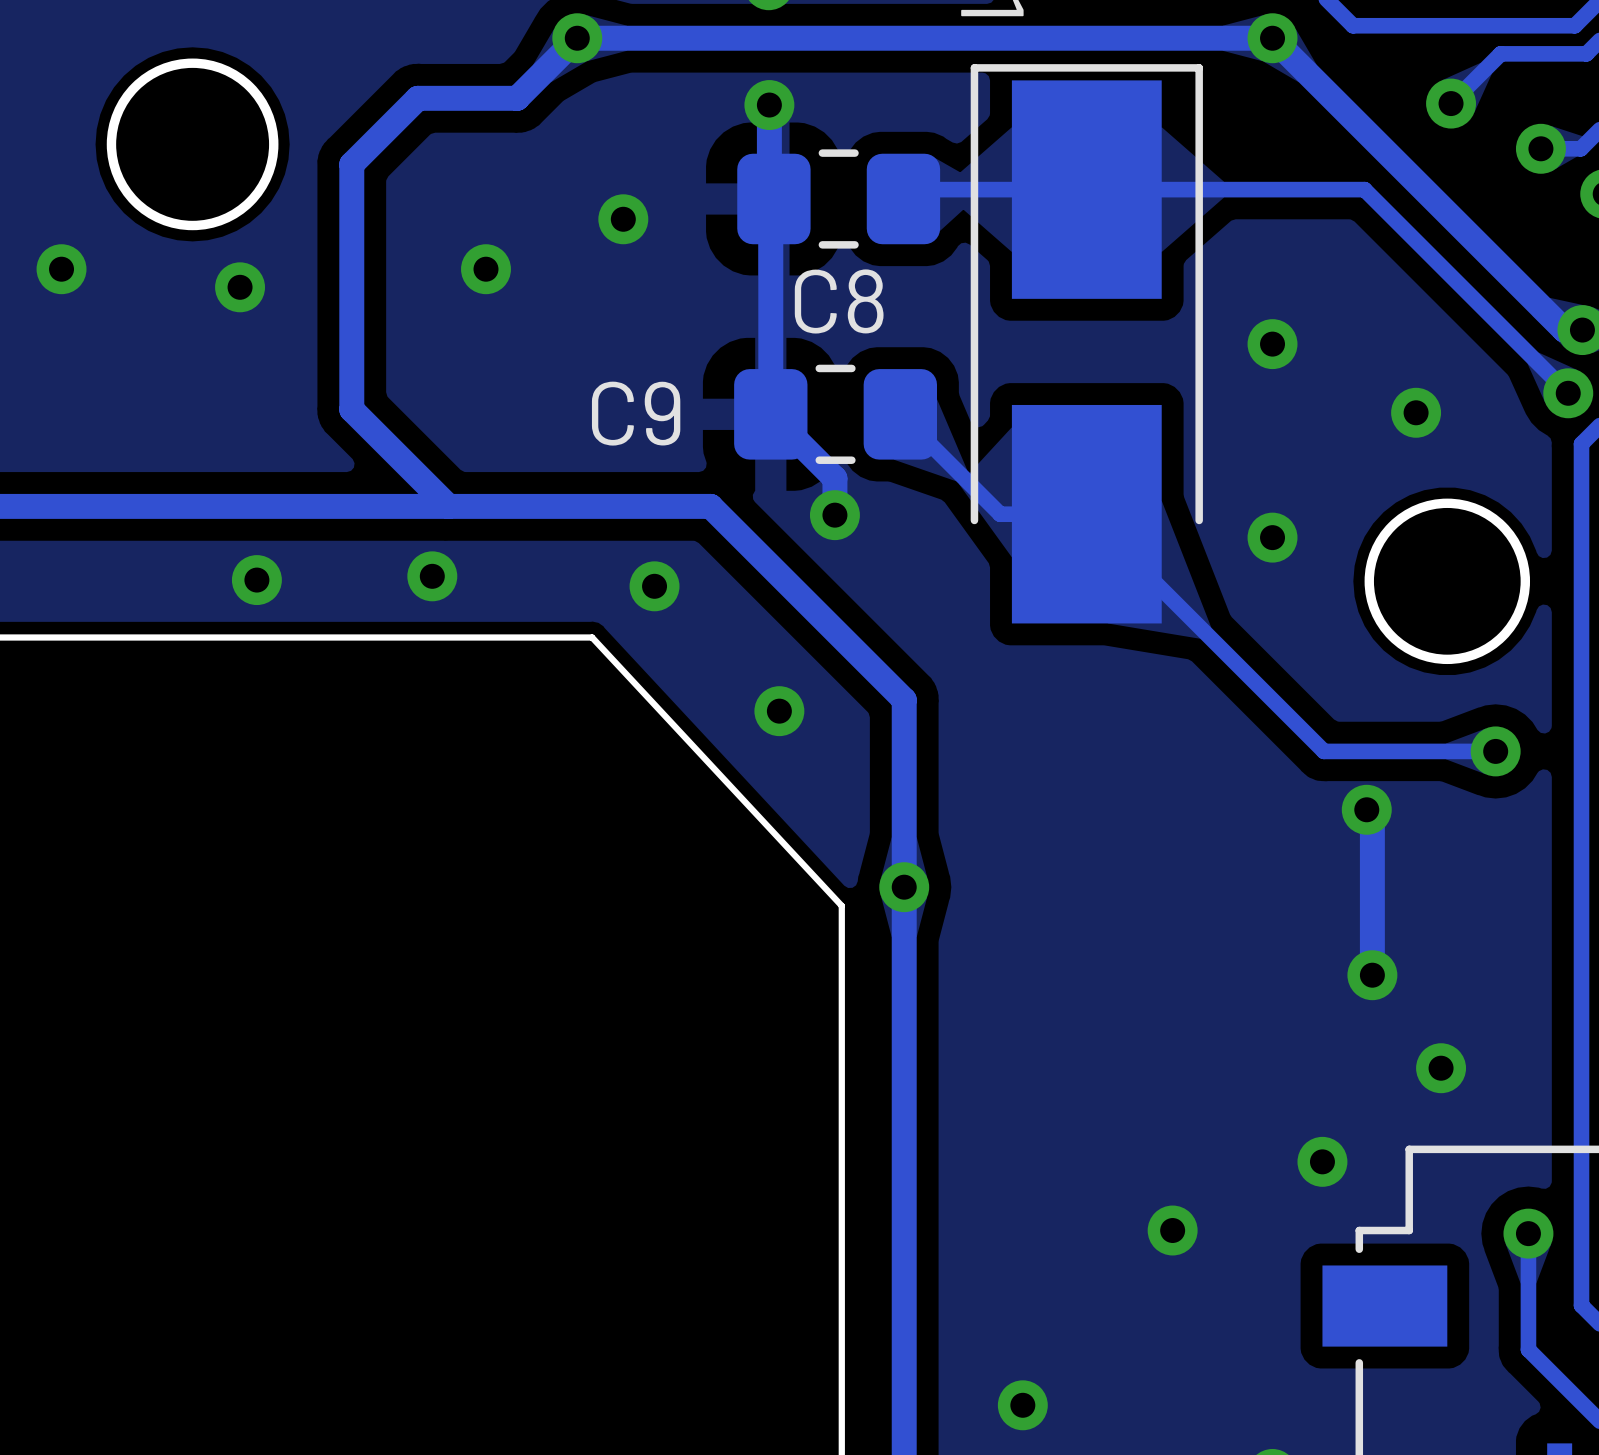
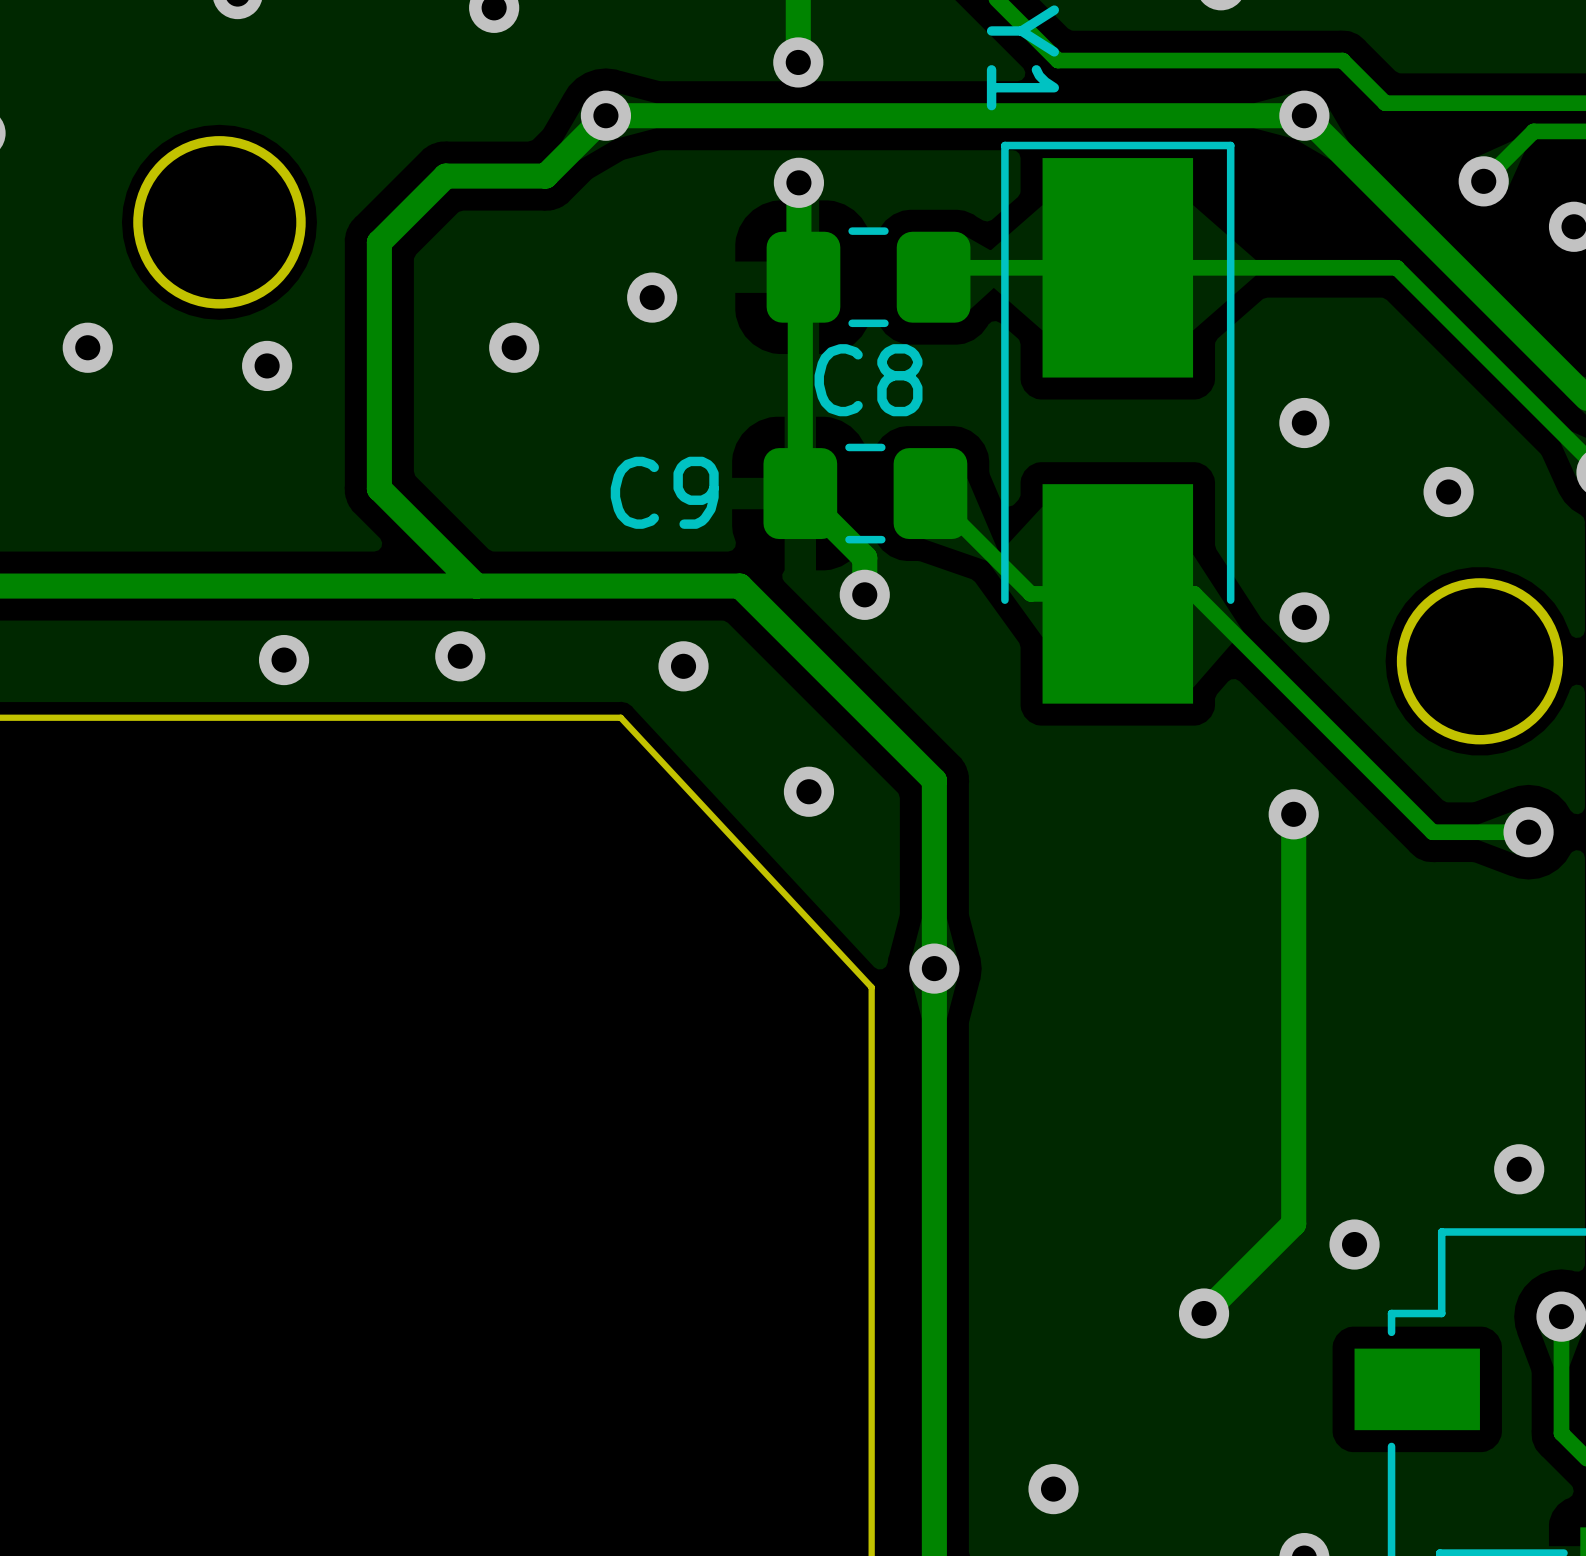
track: (1086, 514) (1324, 751) (1400, 751) -> (1117, 593) (1194, 593) (1432, 832)
track: none -> (1293, 814) (1293, 1223) (1204, 1313)
track: (1366, 809) (1372, 815) (1372, 975) -> none
via position: (1366, 809) -> (1293, 814)
via: (1372, 975) -> none
via position: (1441, 1068) -> (1519, 1169)

